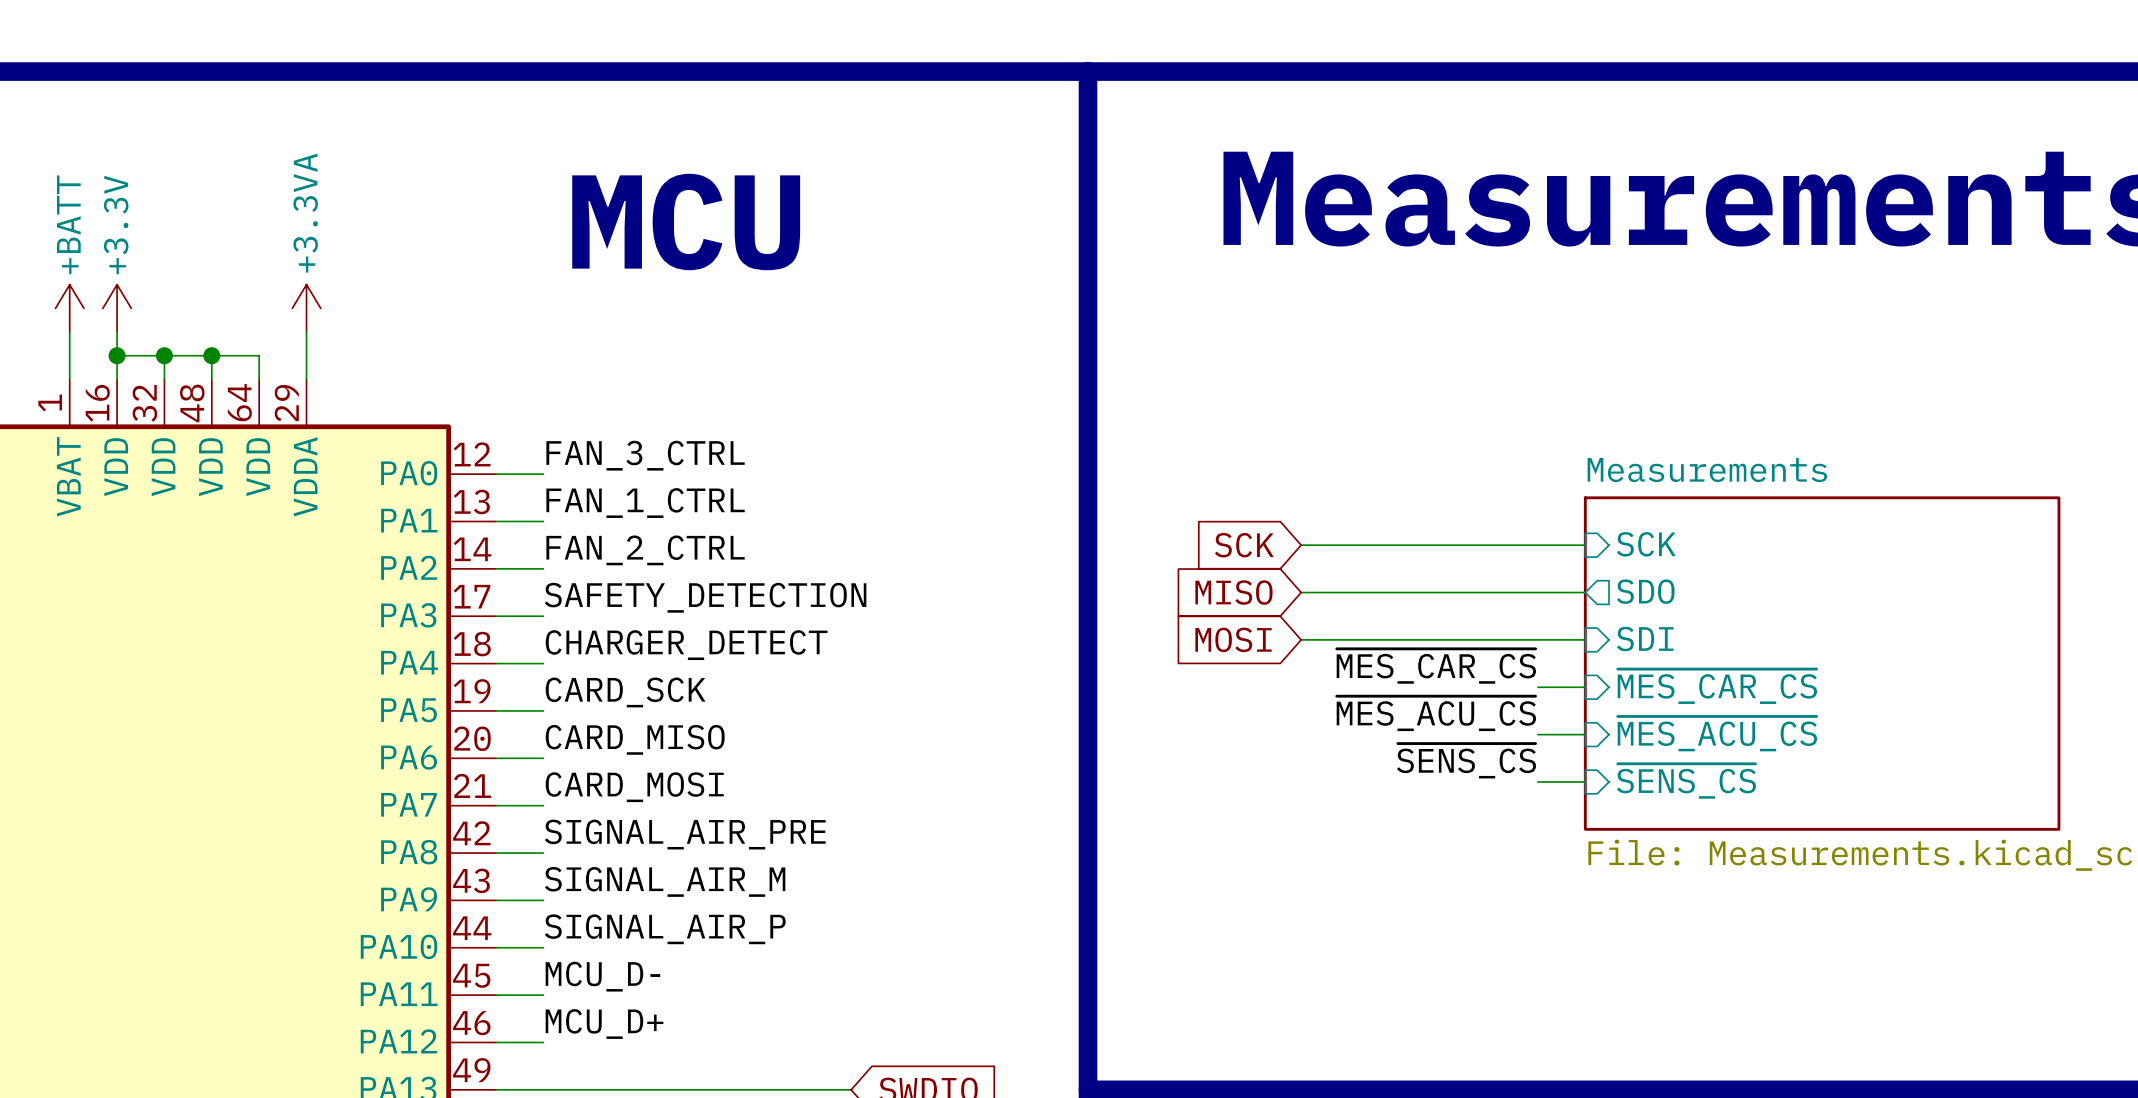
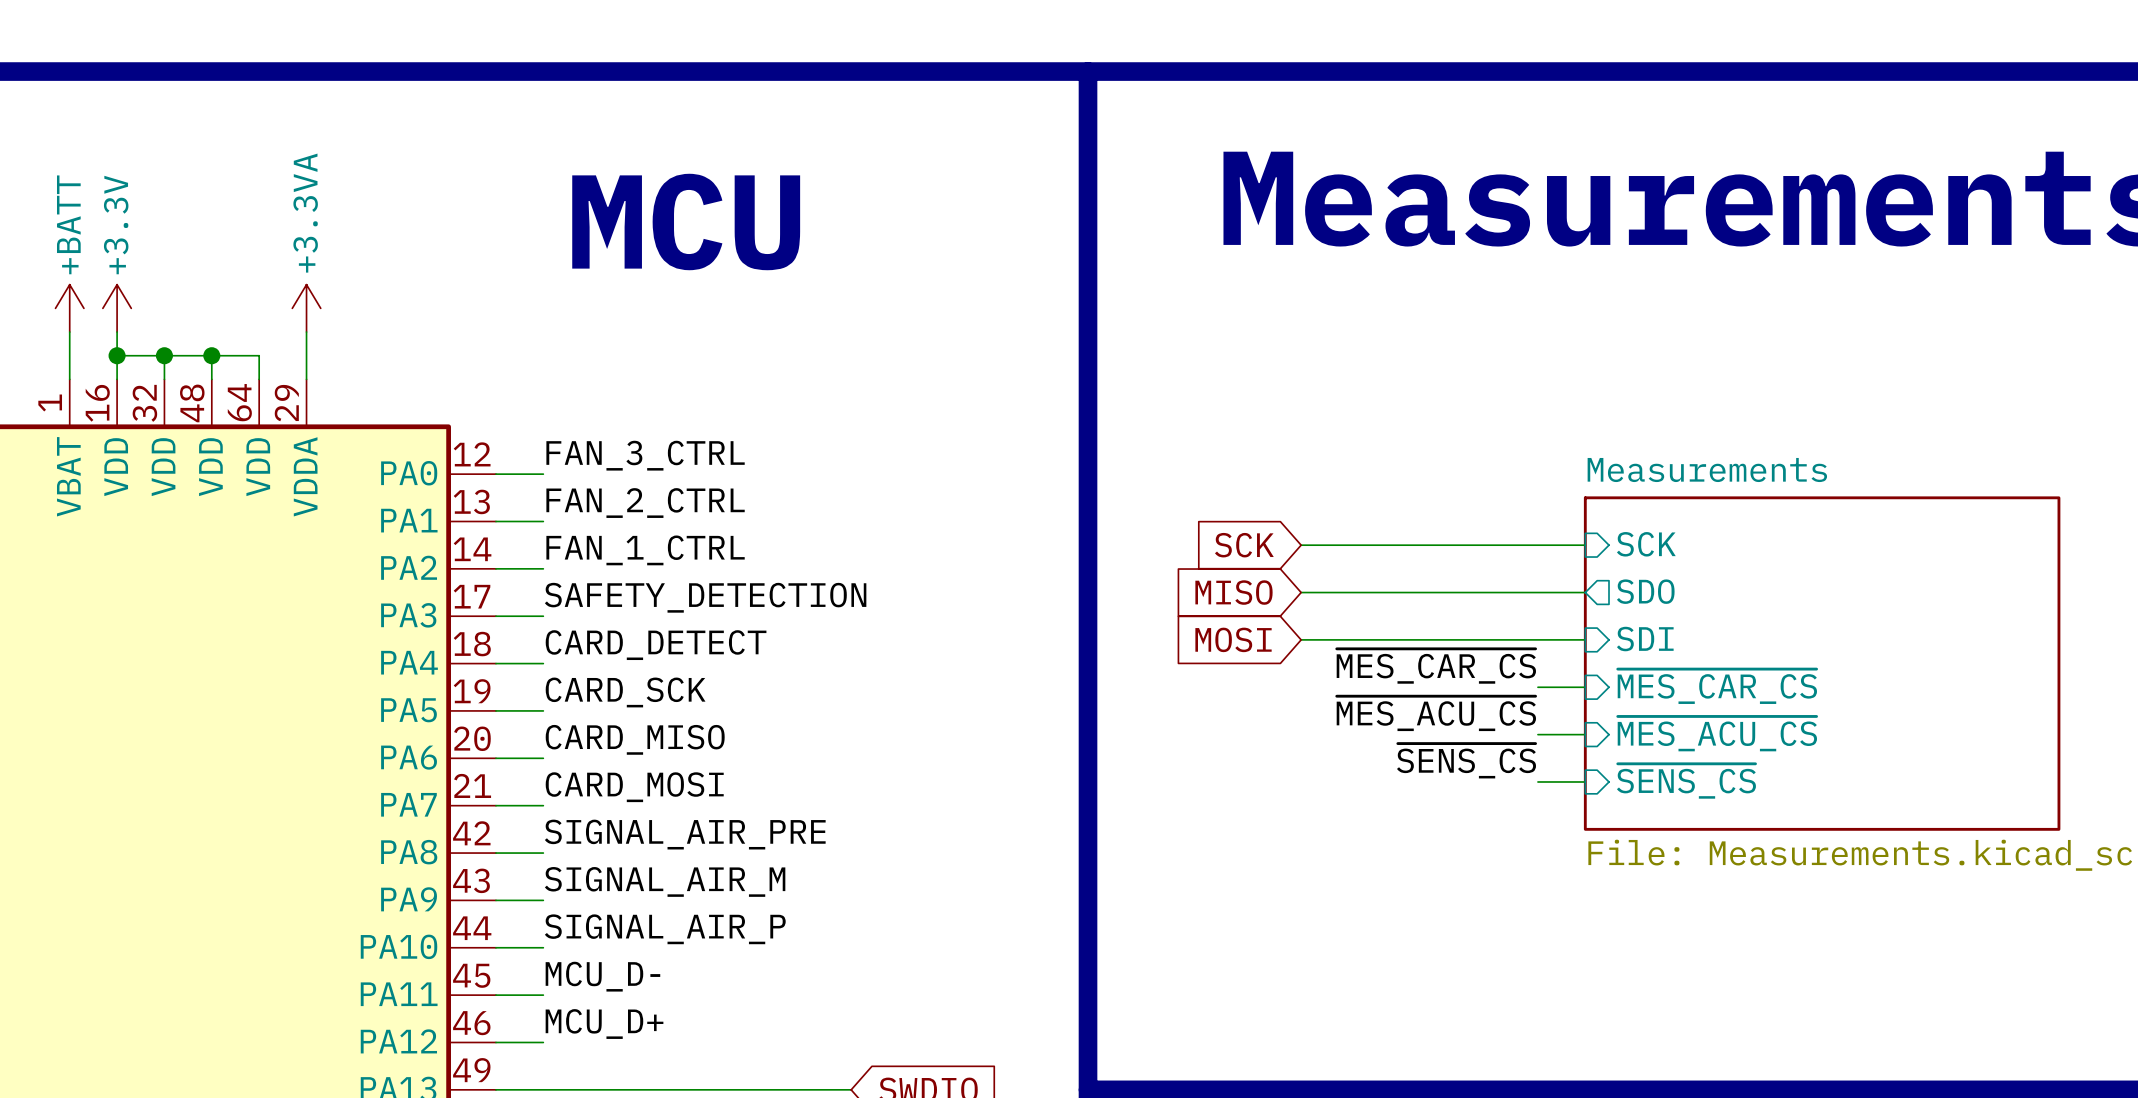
label: FAN_1_CTRL (645, 503) -> FAN_2_CTRL (645, 503)
label: FAN_2_CTRL (645, 550) -> FAN_1_CTRL (645, 550)
label: CHARGER_DETECT (686, 645) -> CARD_DETECT (656, 645)

